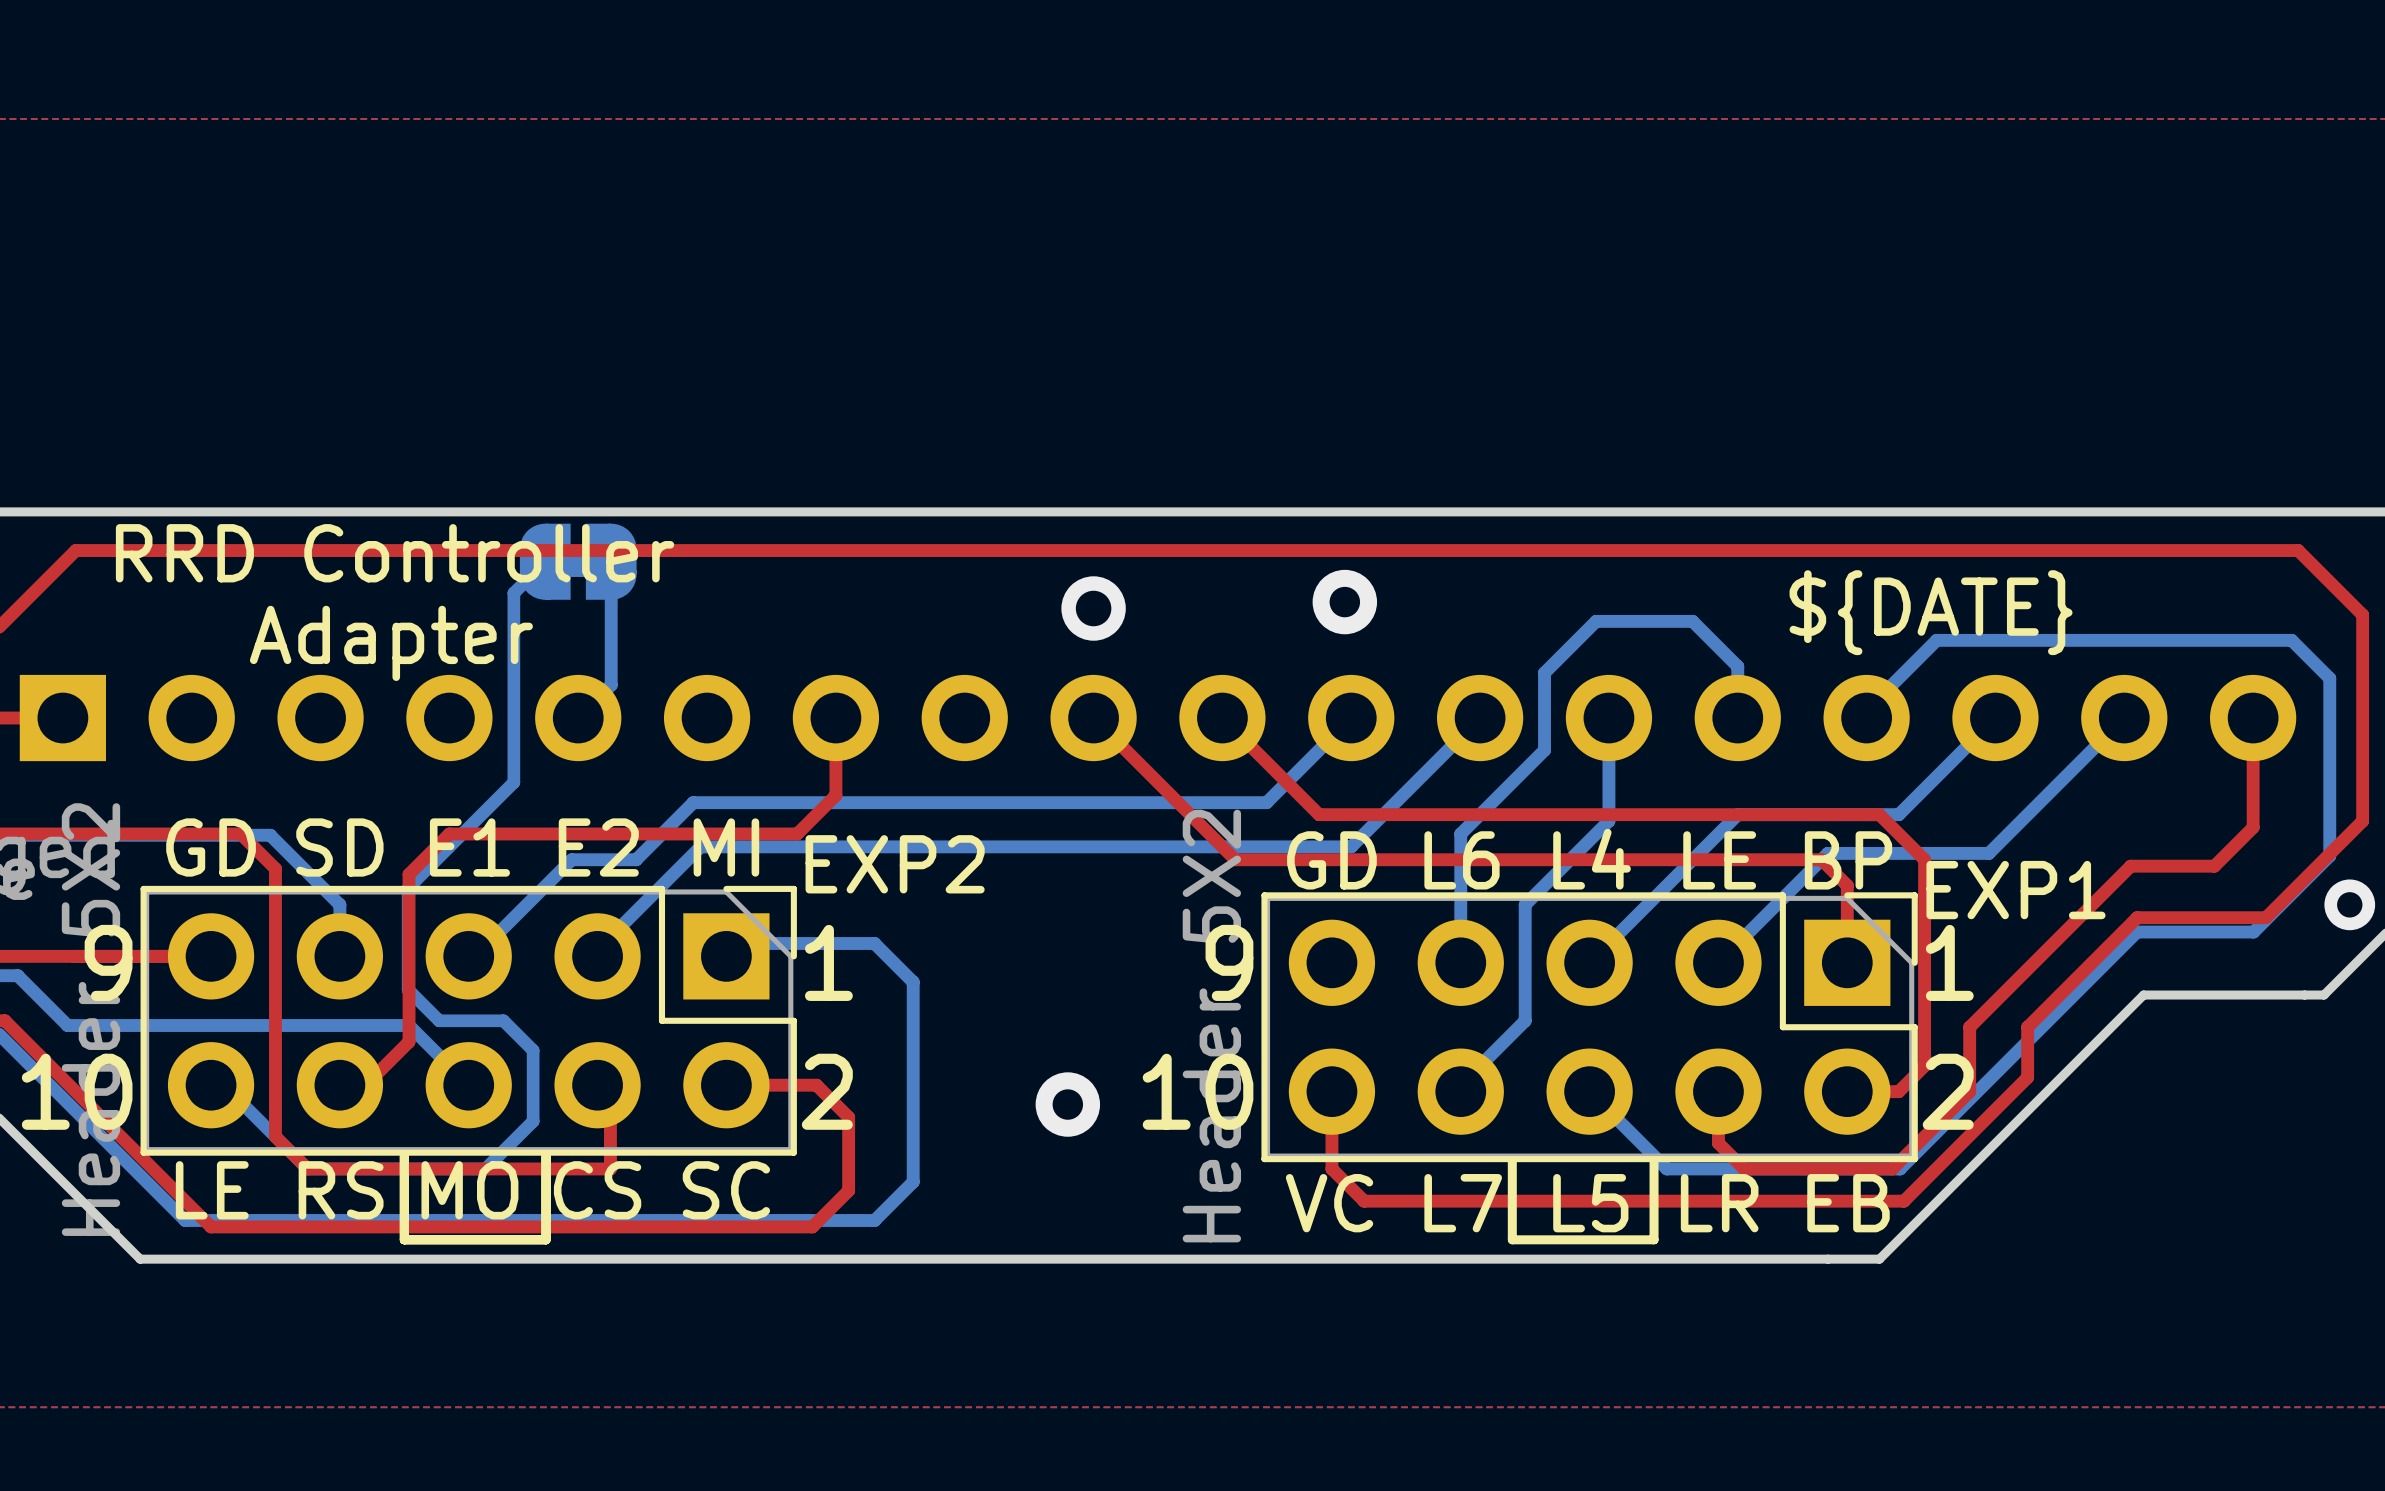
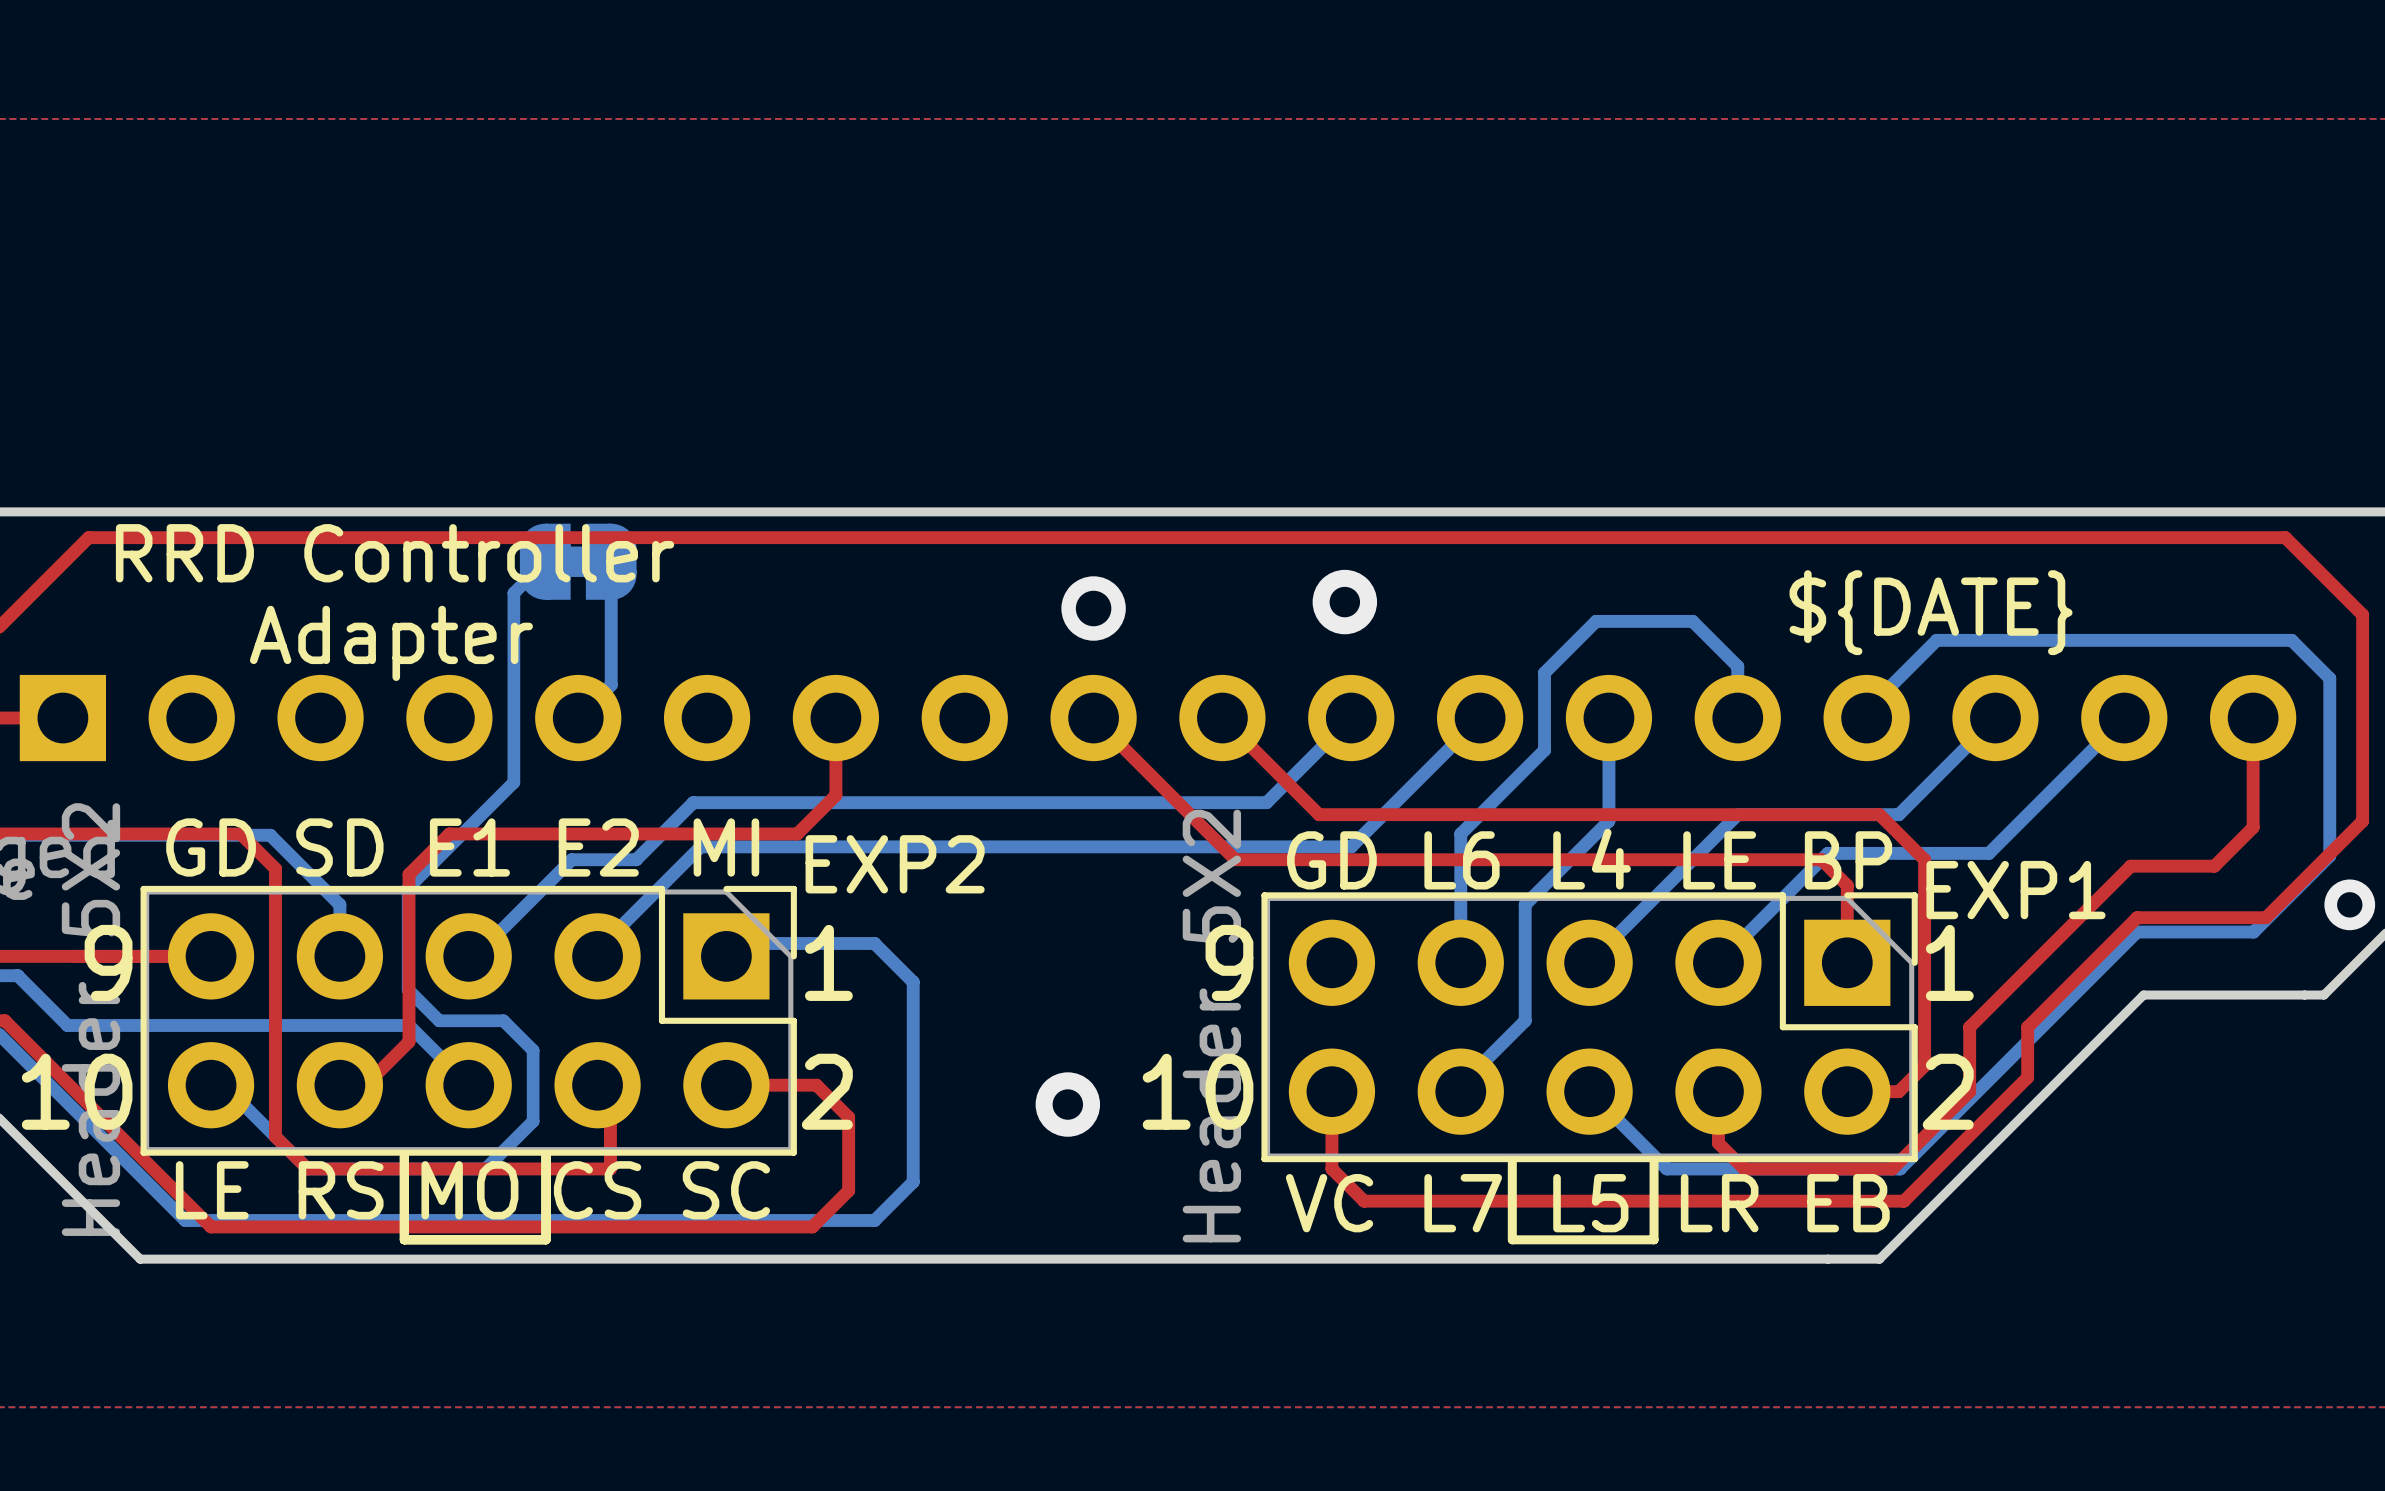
top track: (75, 550) (2298, 550) -> (75, 550) (88, 537) (2285, 537) (2298, 550)

